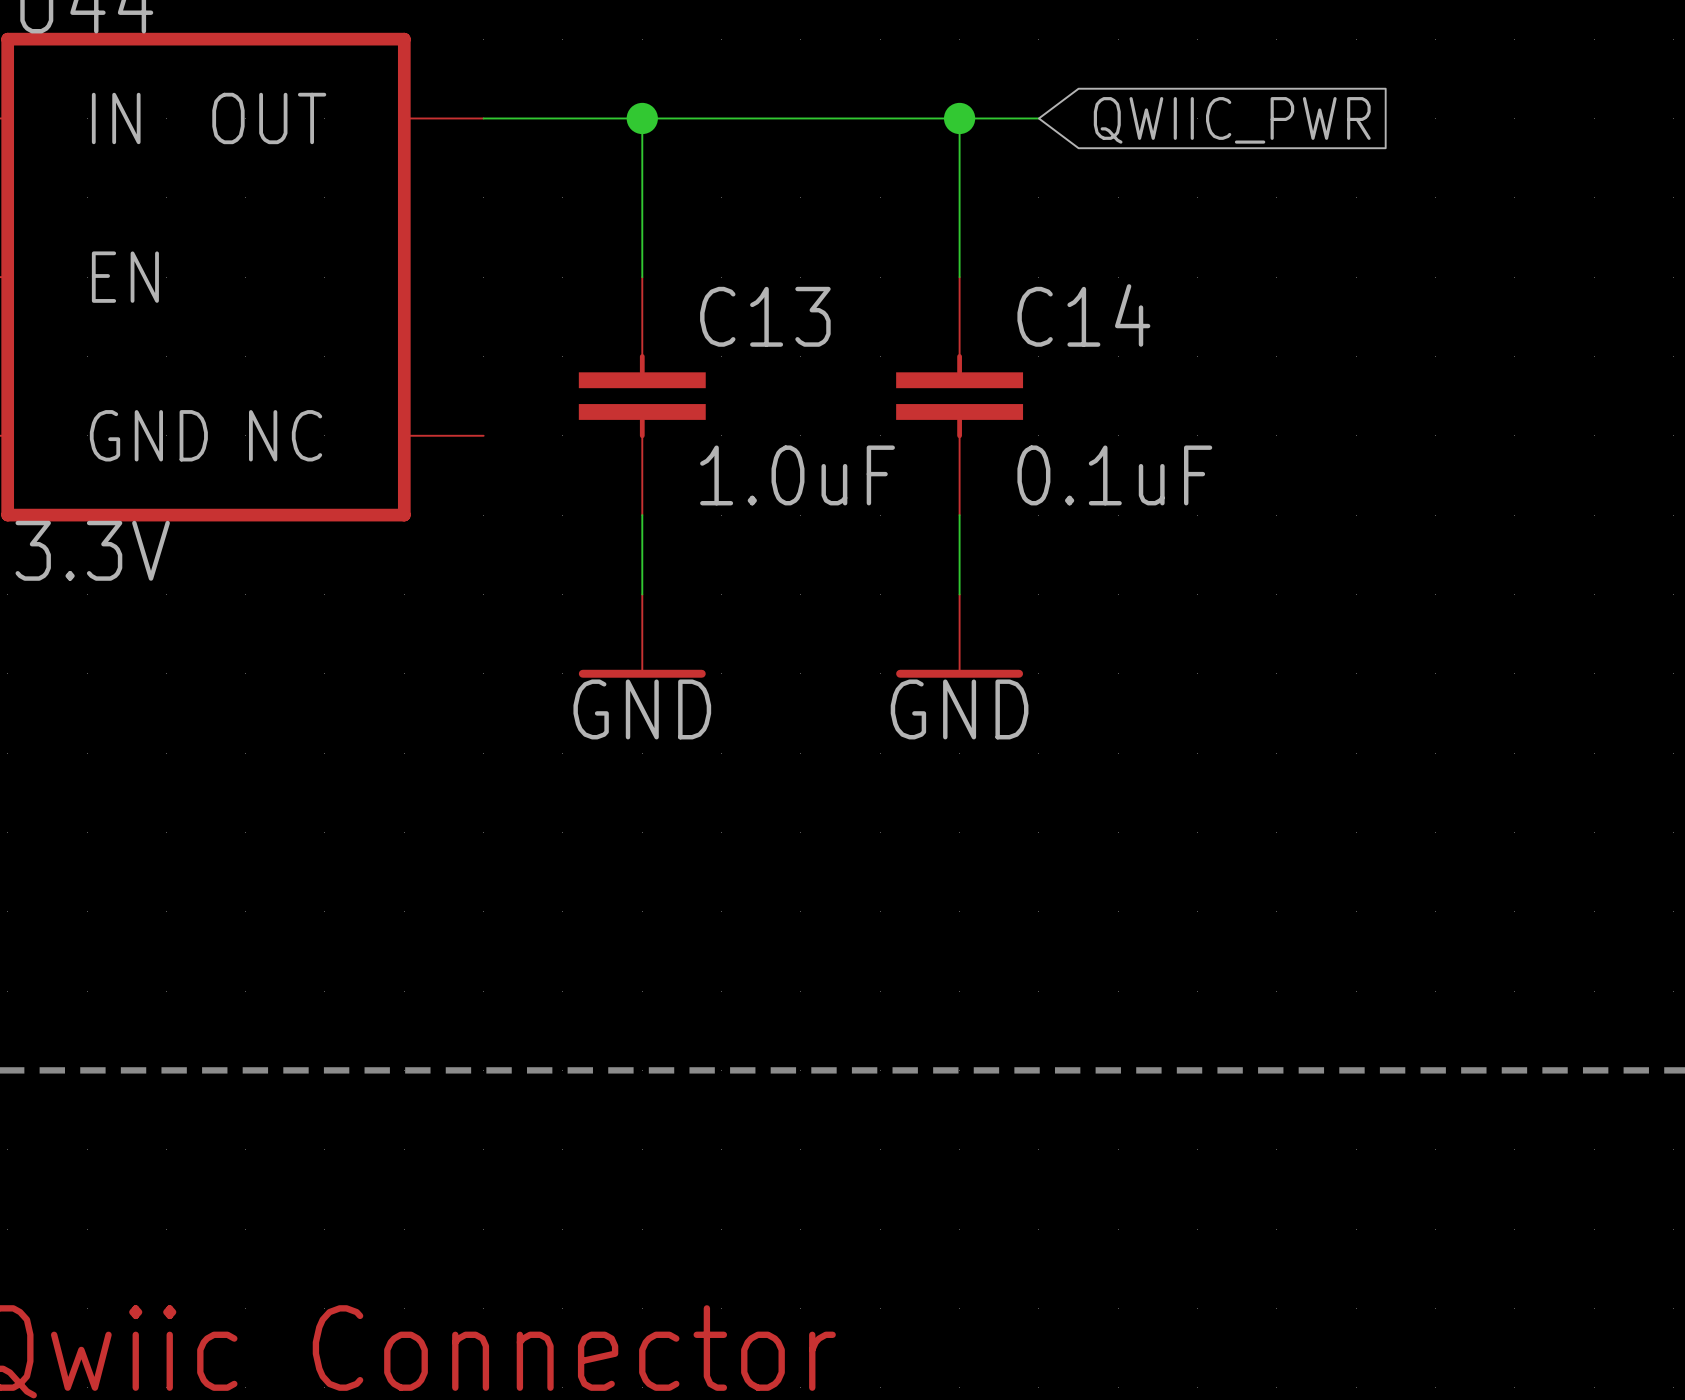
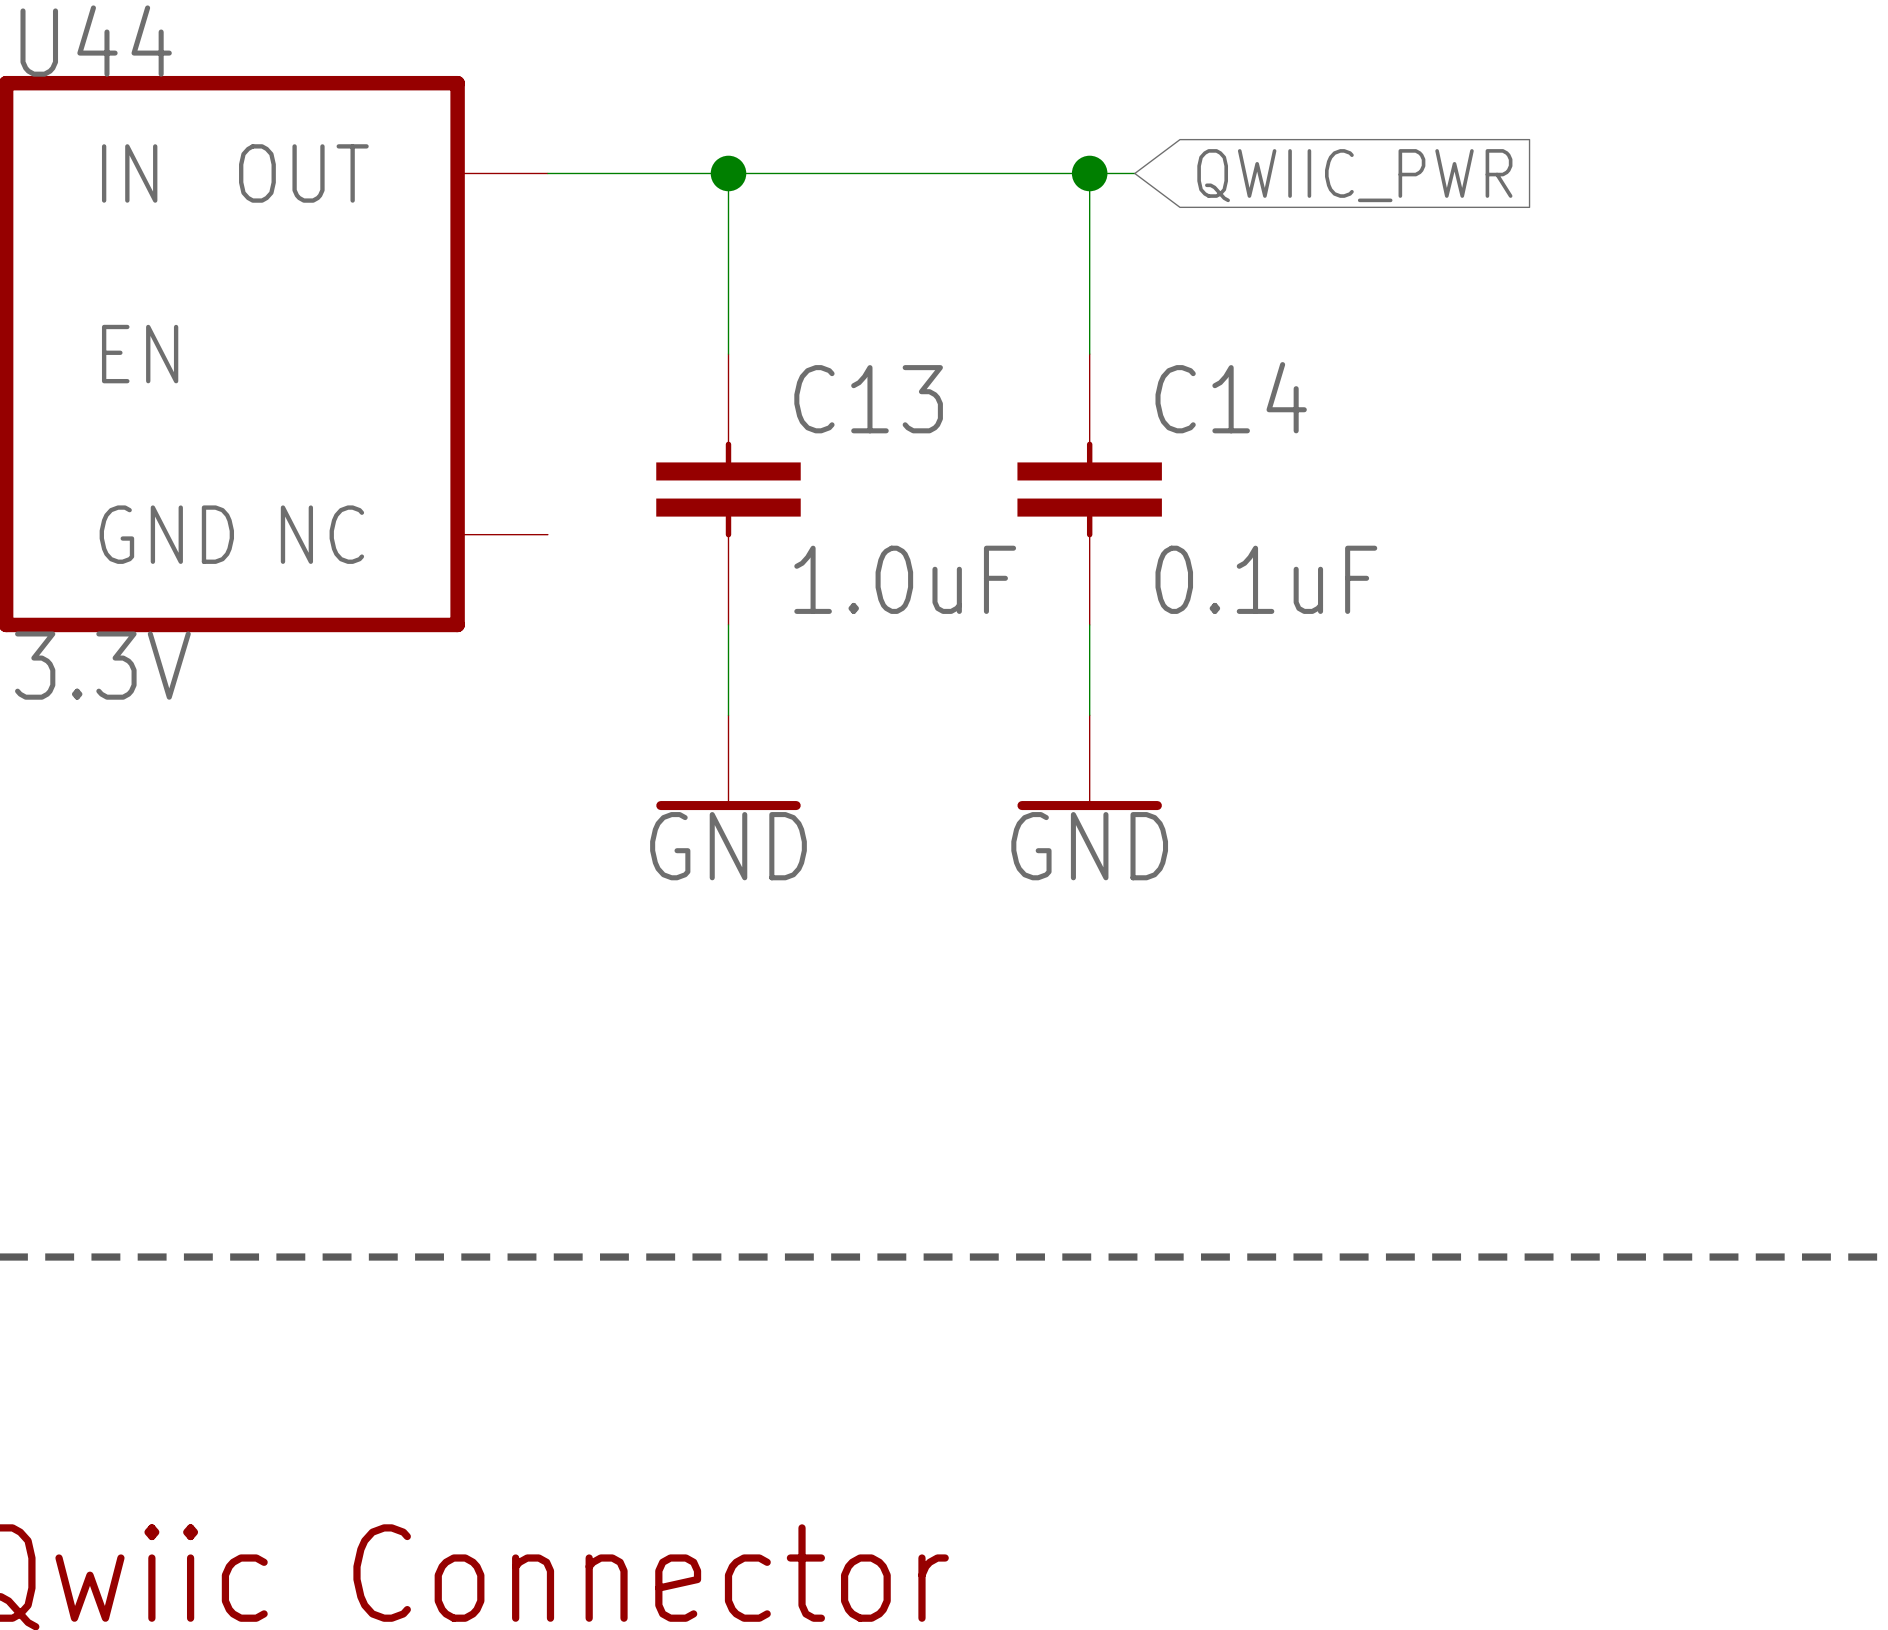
wire: (999, 118) (1038, 118) -> none
global label position: QWIIC_PWR (1232, 120) -> QWIIC_PWR (1354, 175)

